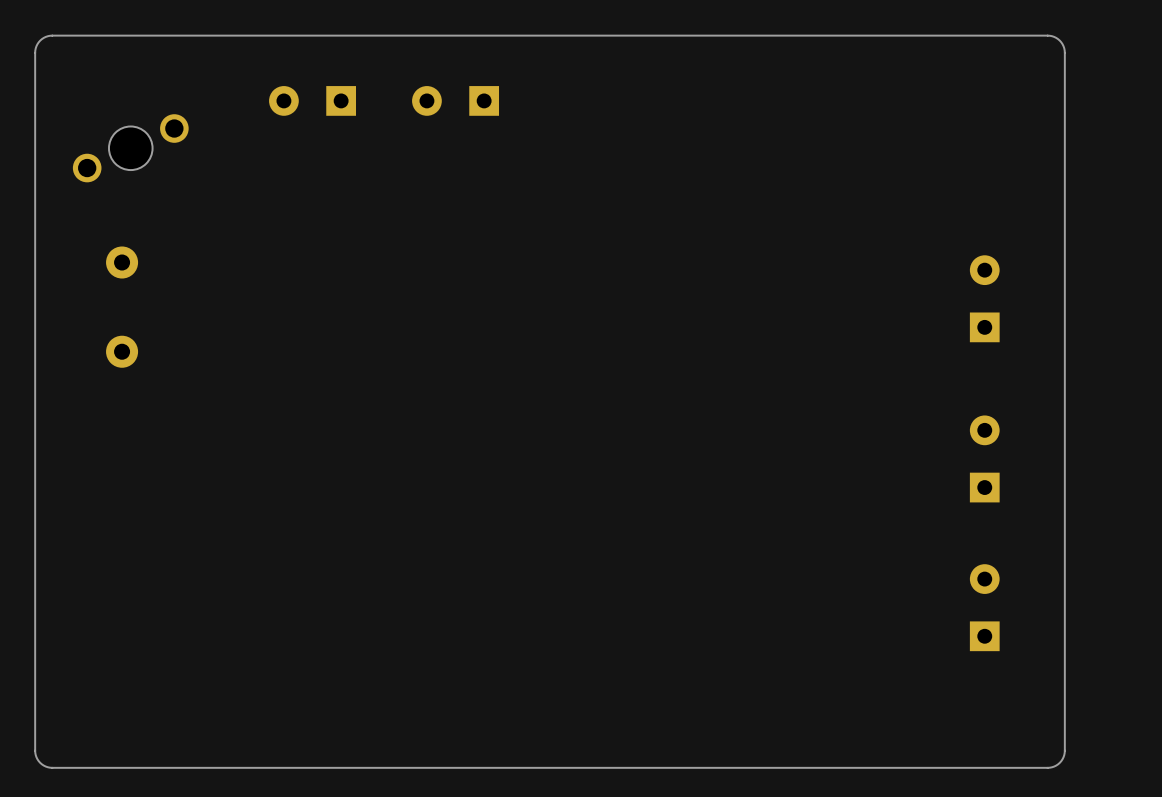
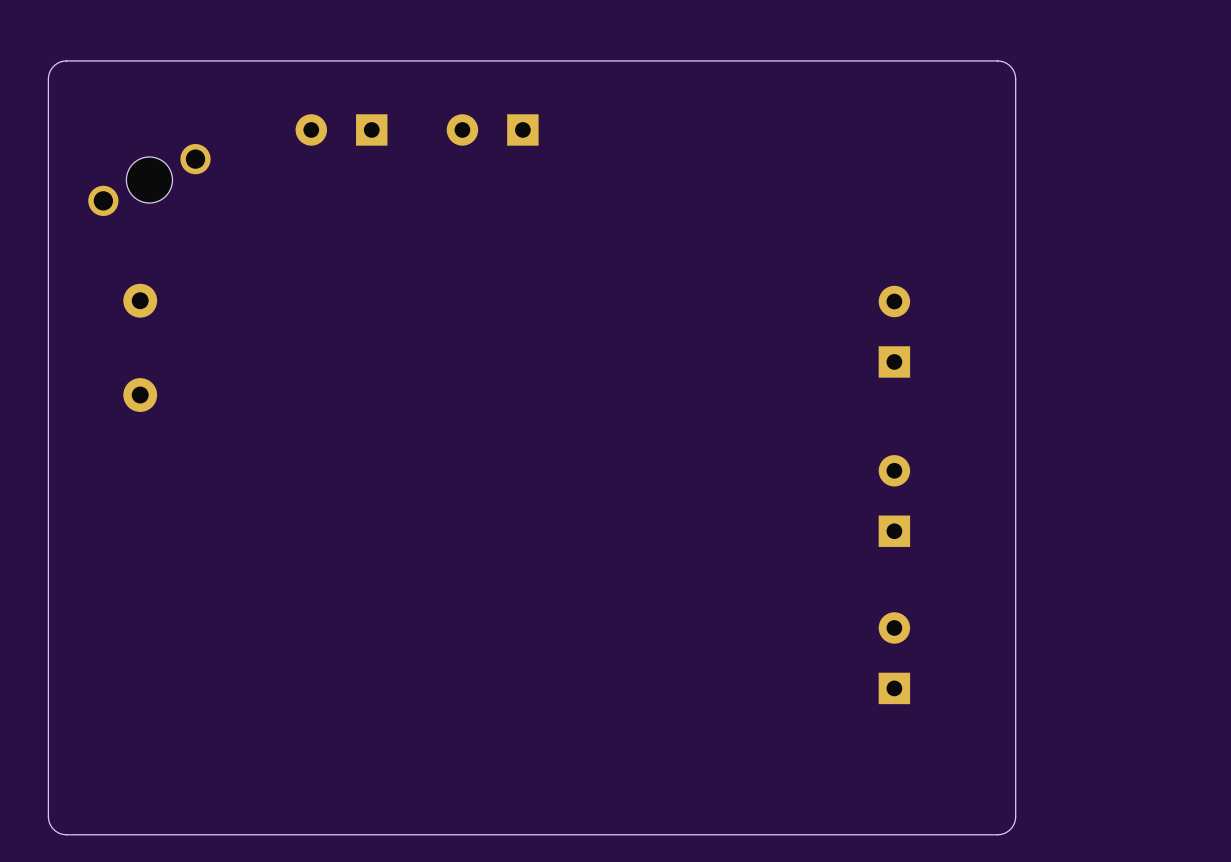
board edge: (933, 35) (1049, 35) (1059, 40) (1064, 52) (1064, 752) (1059, 762) (1049, 767) (933, 767) -> (997, 60) (1010, 66) (1015, 79) (1015, 816) (1010, 829) (997, 834)
part: none -> (894, 331)
part: (984, 298) -> none
part: none -> (894, 501)
part: (984, 458) -> none
part: none -> (894, 658)
part: (984, 607) -> none

